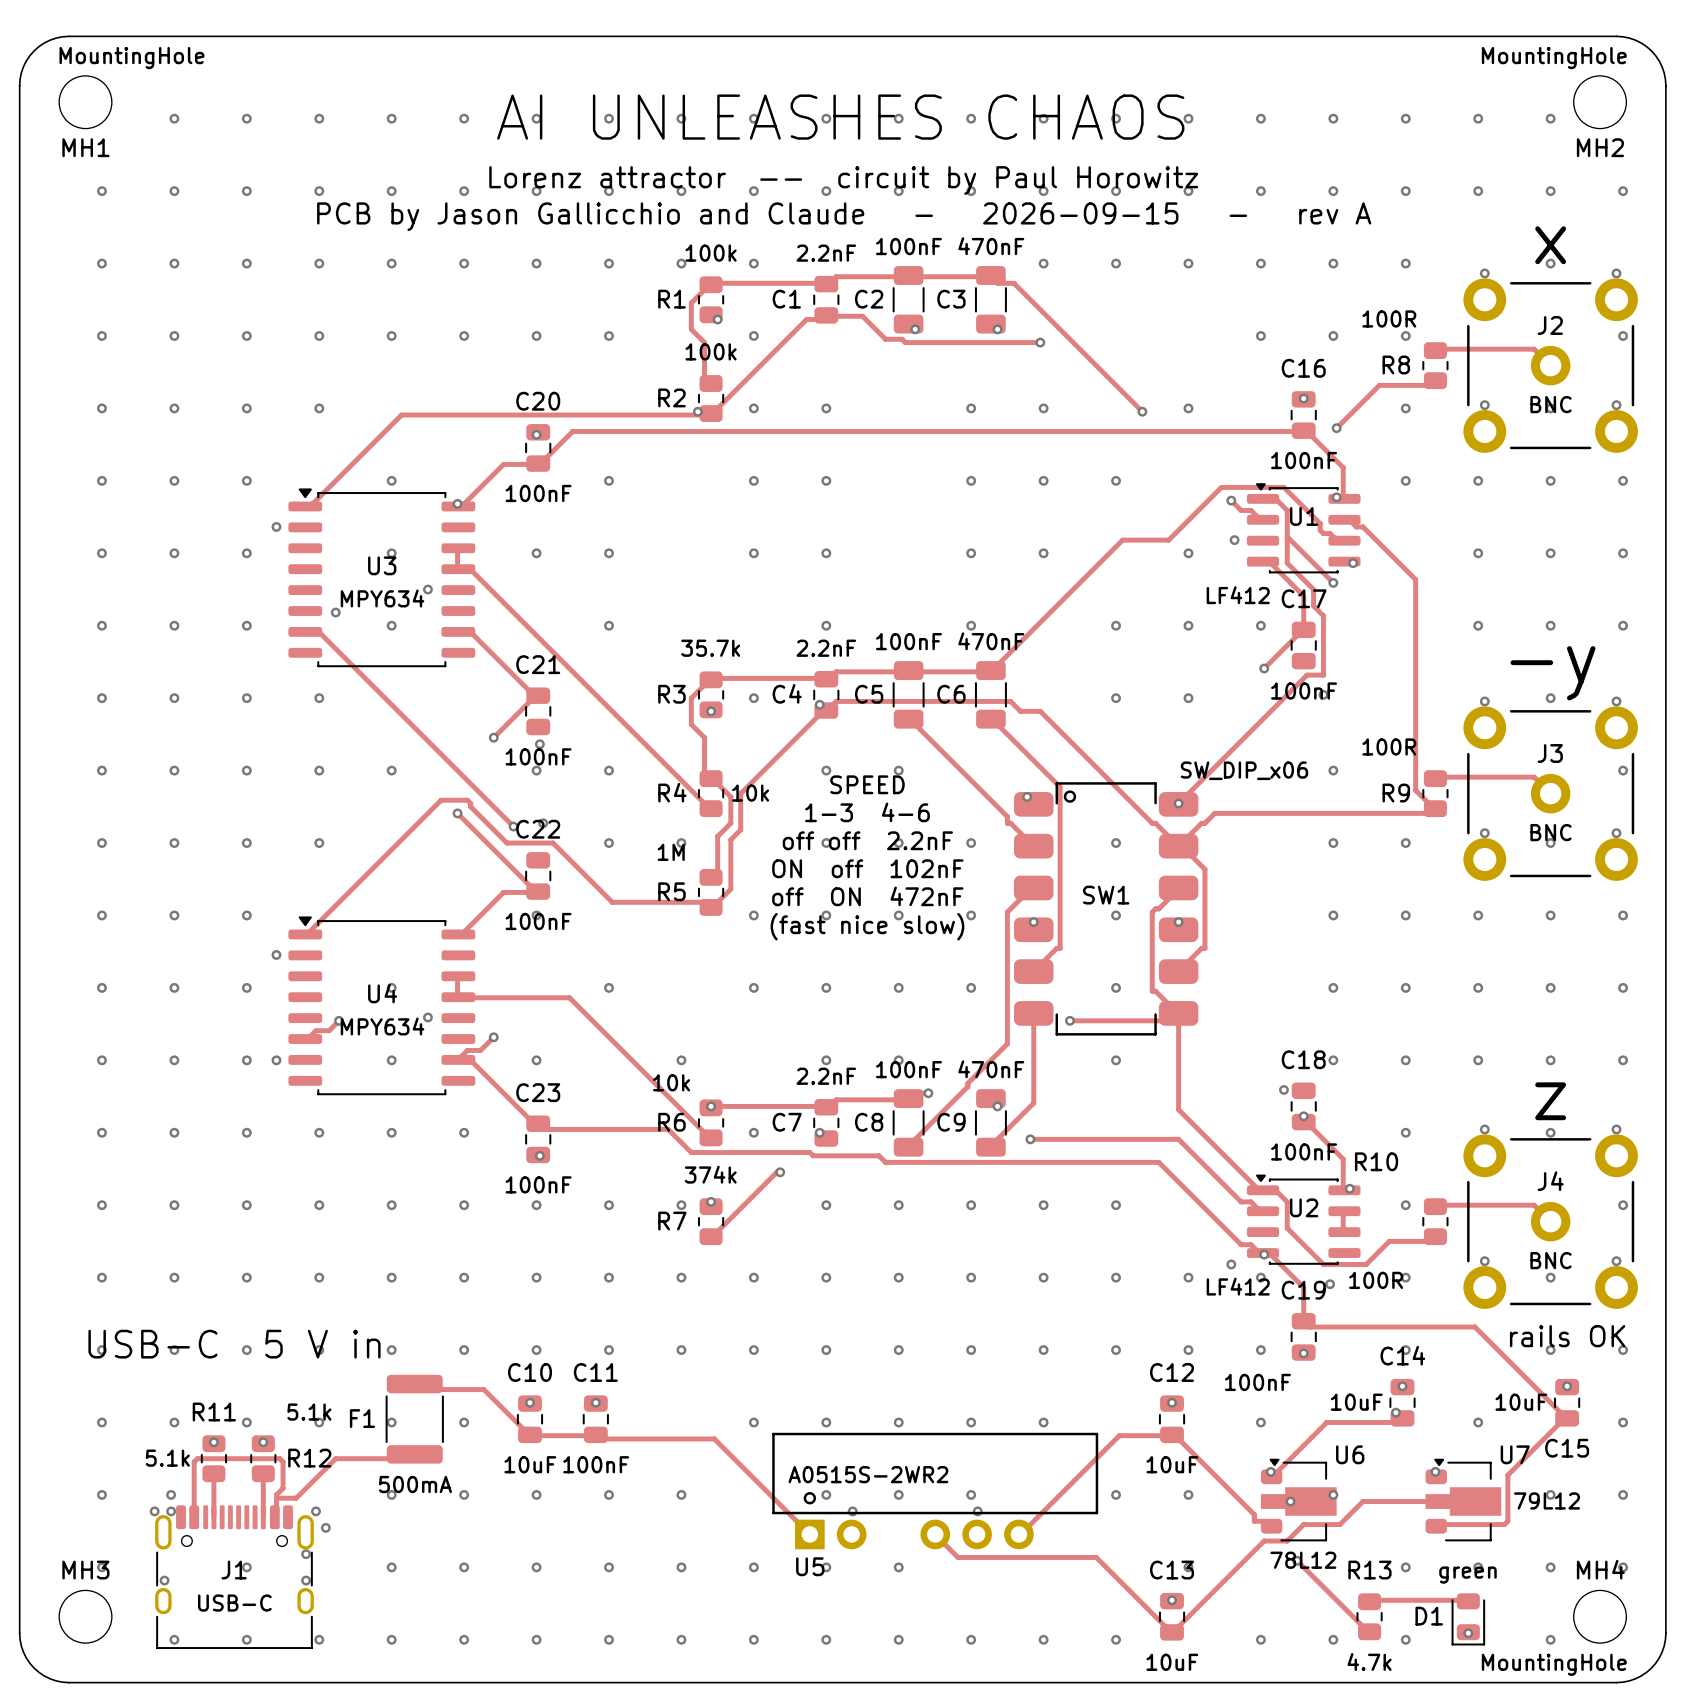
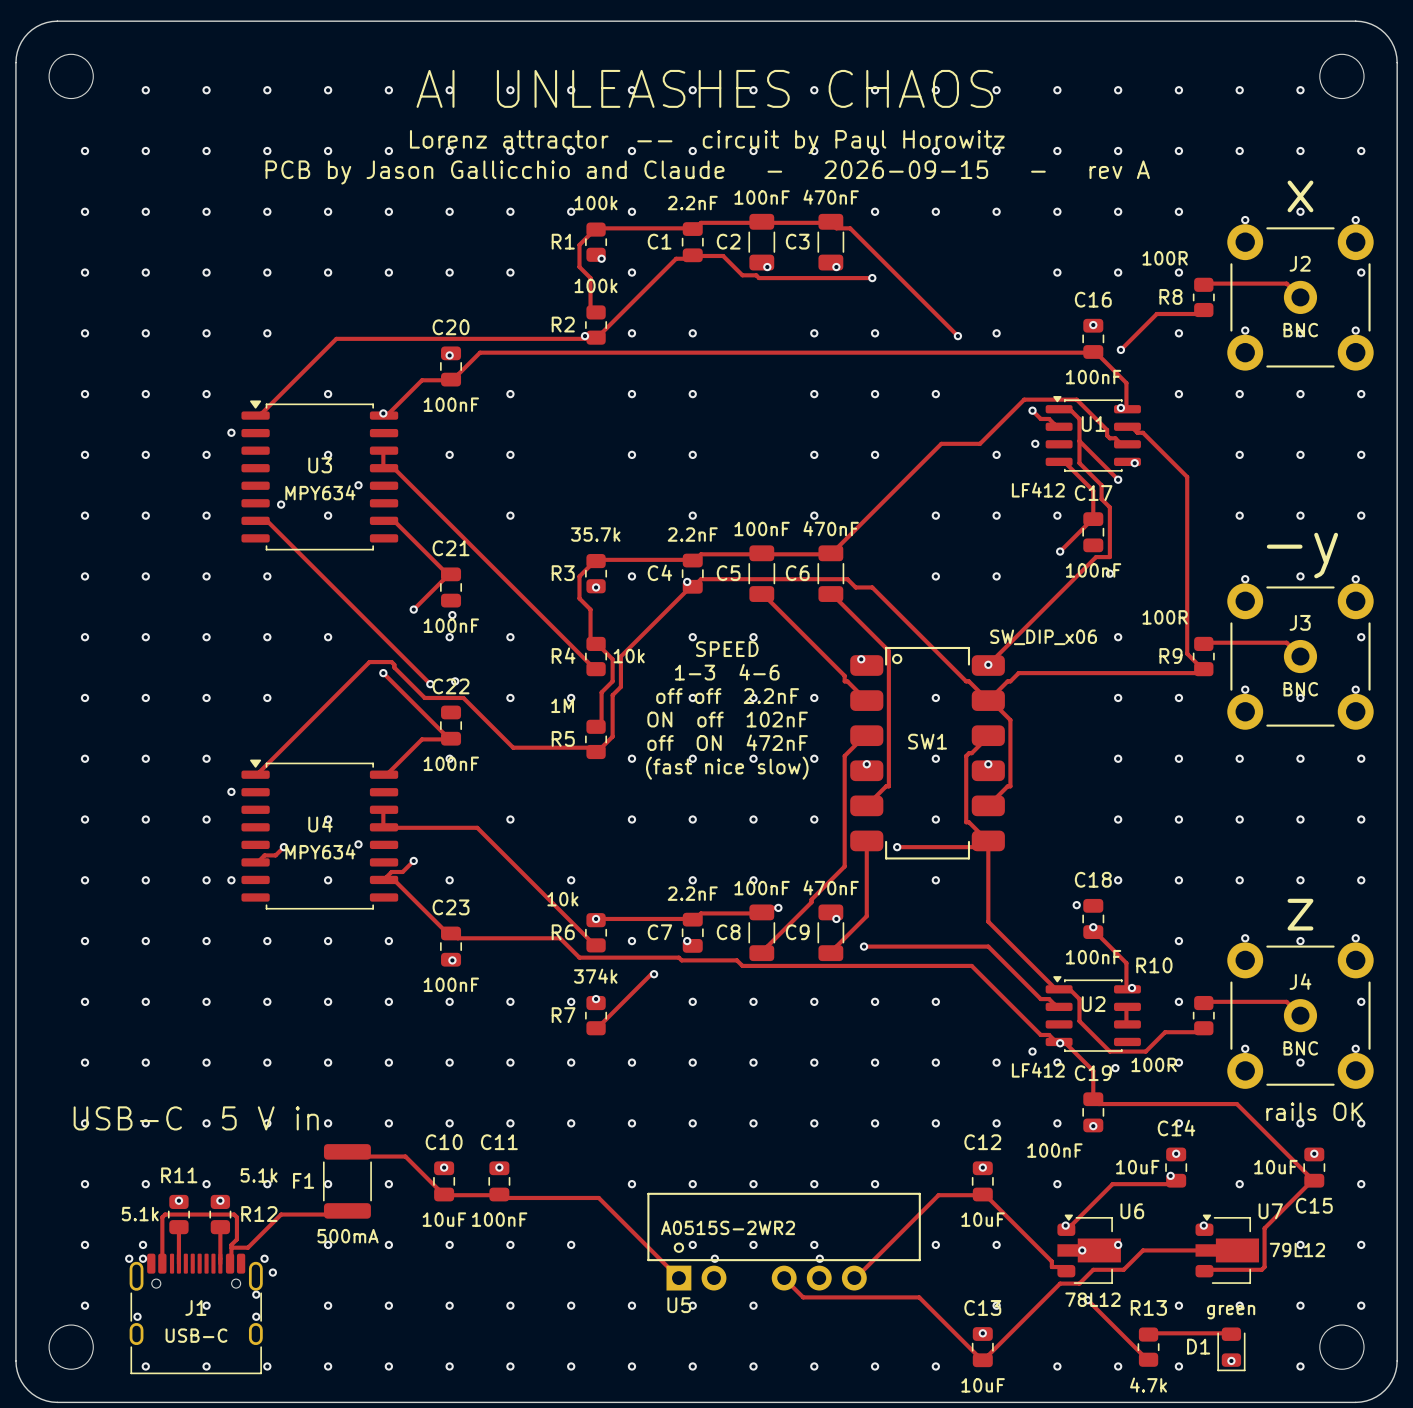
MH1 value: MountingHole (131, 58) -> none
MH2 value: MountingHole (1554, 58) -> none
MH1 name: MH1 (85, 147) -> none
MH2 name: MH2 (1600, 147) -> none
MH4 name: MH4 (1600, 1569) -> none
MH3 name: MH3 (85, 1570) -> none
MH4 value: MountingHole (1554, 1664) -> none

